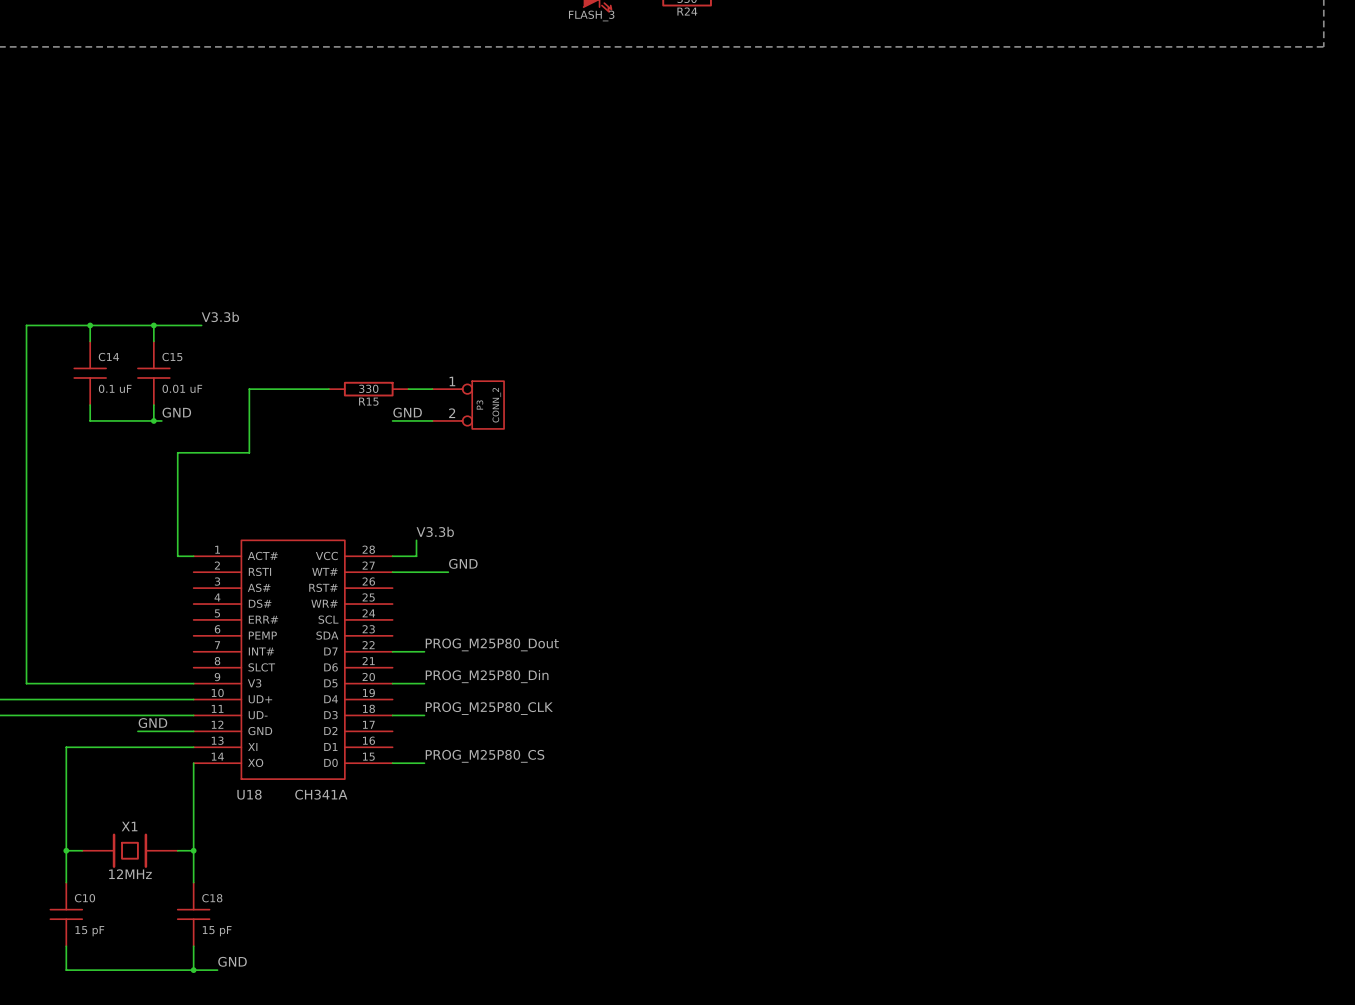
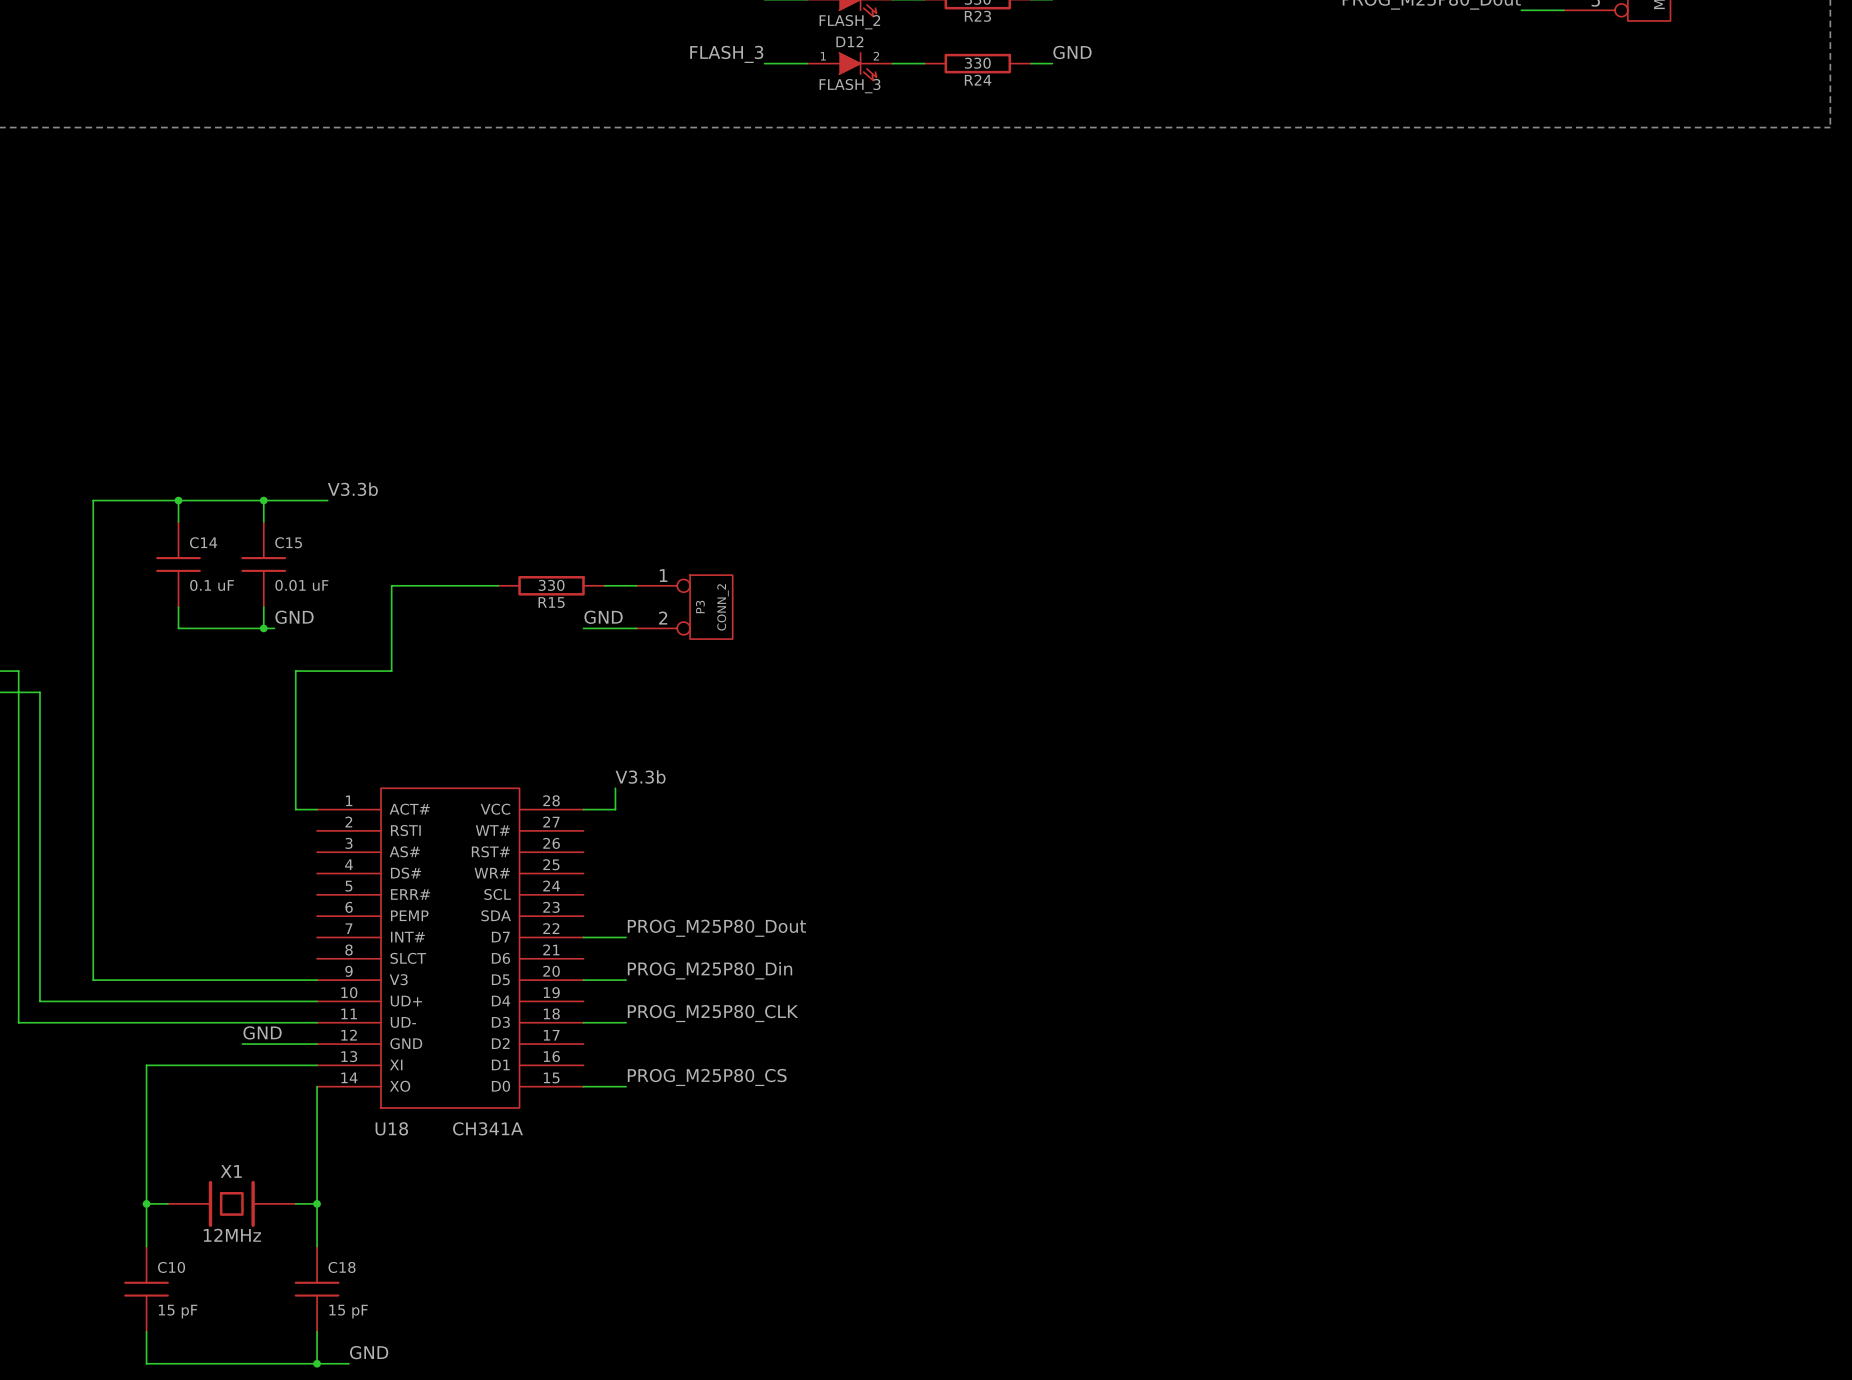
label: GND (463, 563) -> none
wire: (392, 572) (448, 572) -> none

